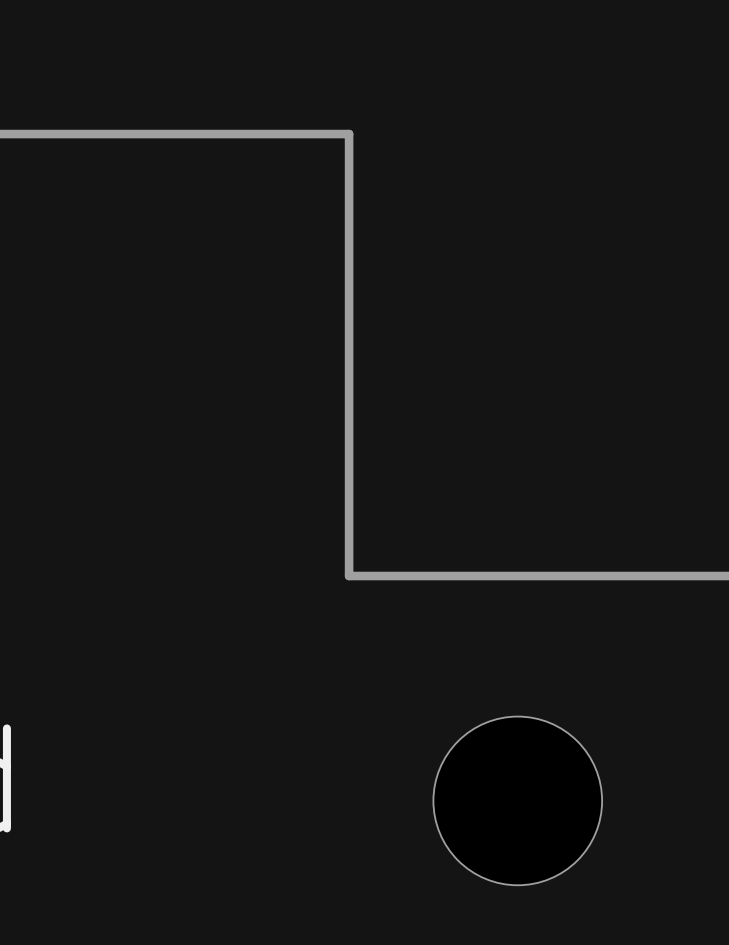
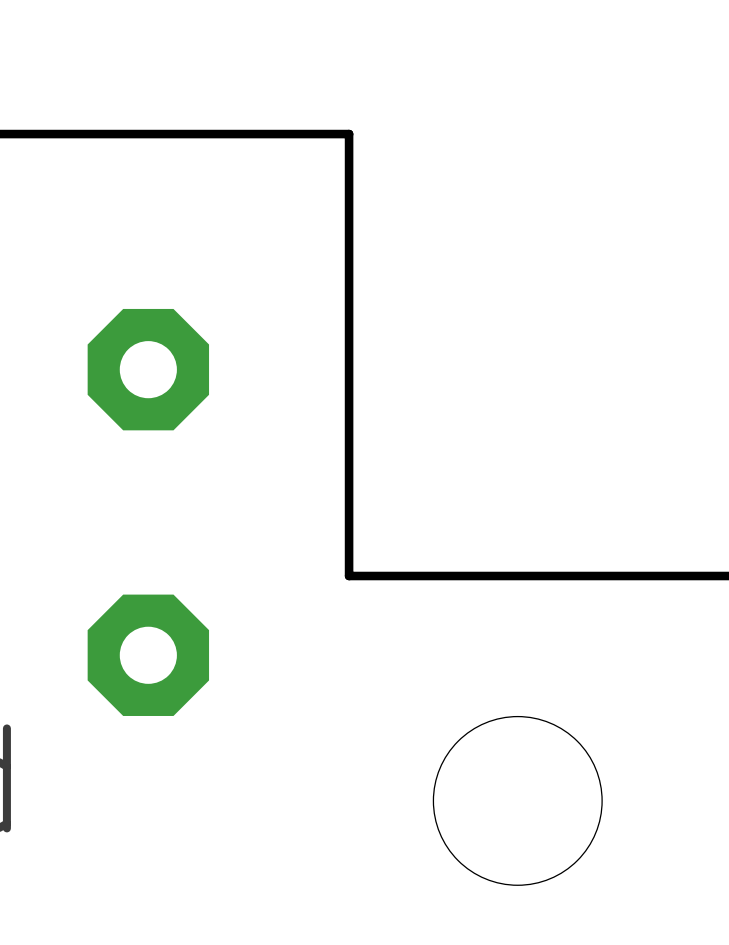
part: none -> (148, 369)
part: none -> (148, 655)

